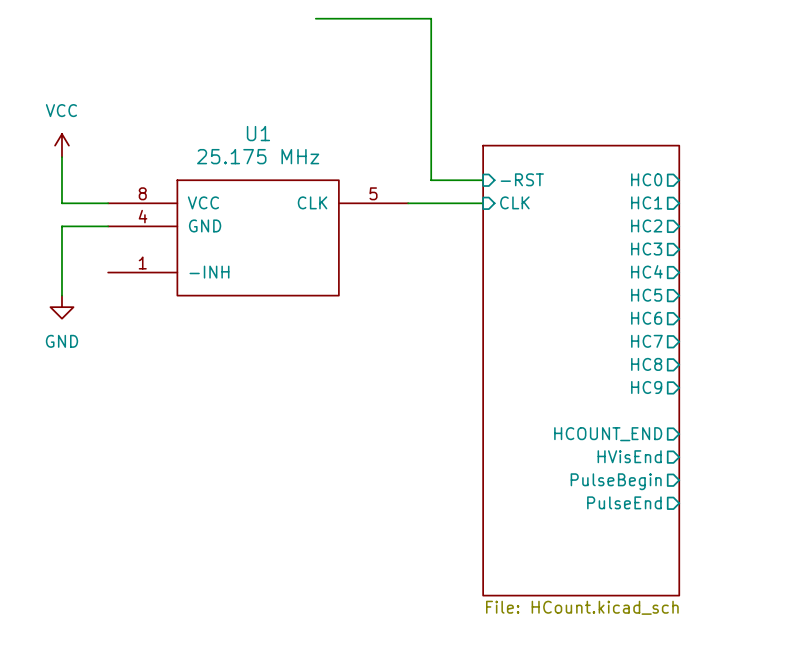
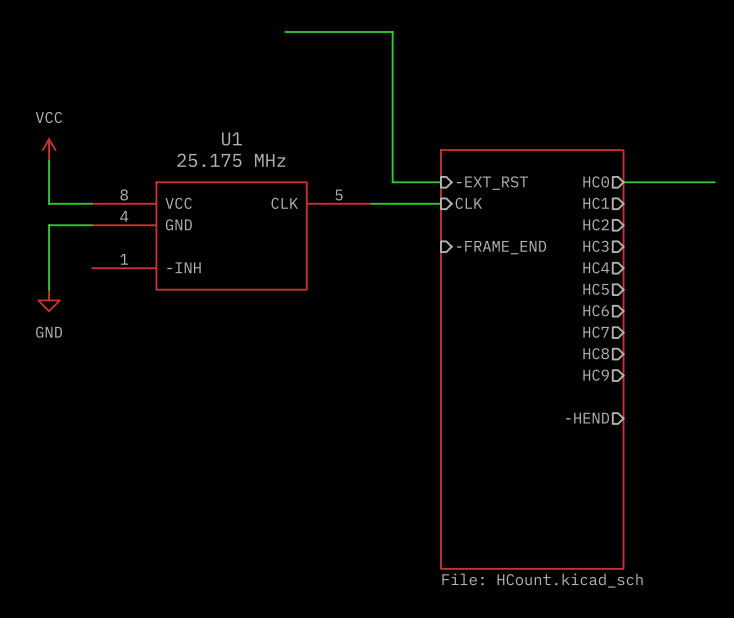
sheet pin: -RST (522, 179) -> -EXT_RST (492, 183)
wire: none -> (623, 182) (714, 182)
sheet pin: none -> -FRAME_END (501, 247)
sheet pin: HCOUNT_END (608, 434) -> -HEND (587, 418)
sheet pin: HVisEnd (629, 456) -> none
sheet pin: PulseBegin (616, 481) -> none
sheet pin: PulseEnd (624, 502) -> none

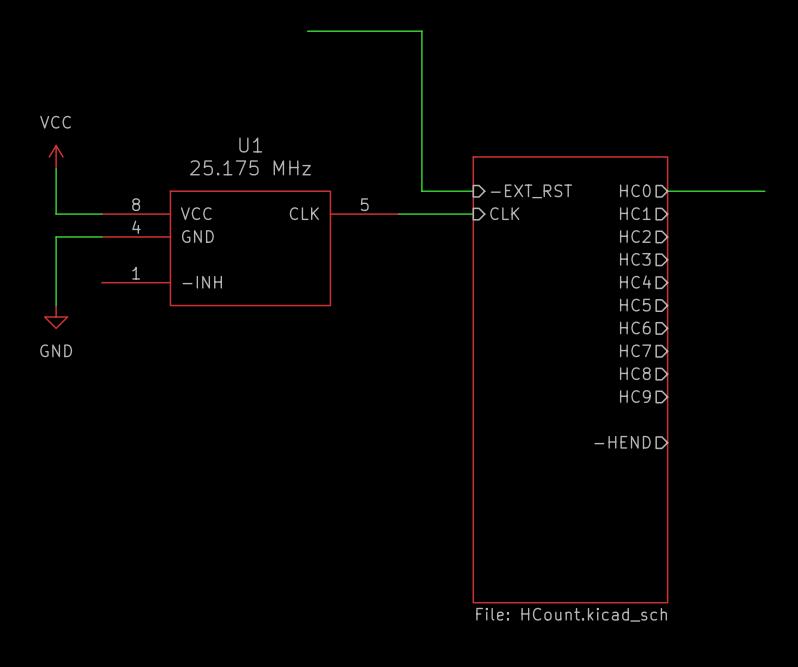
sheet pin: -FRAME_END (501, 247) -> none

